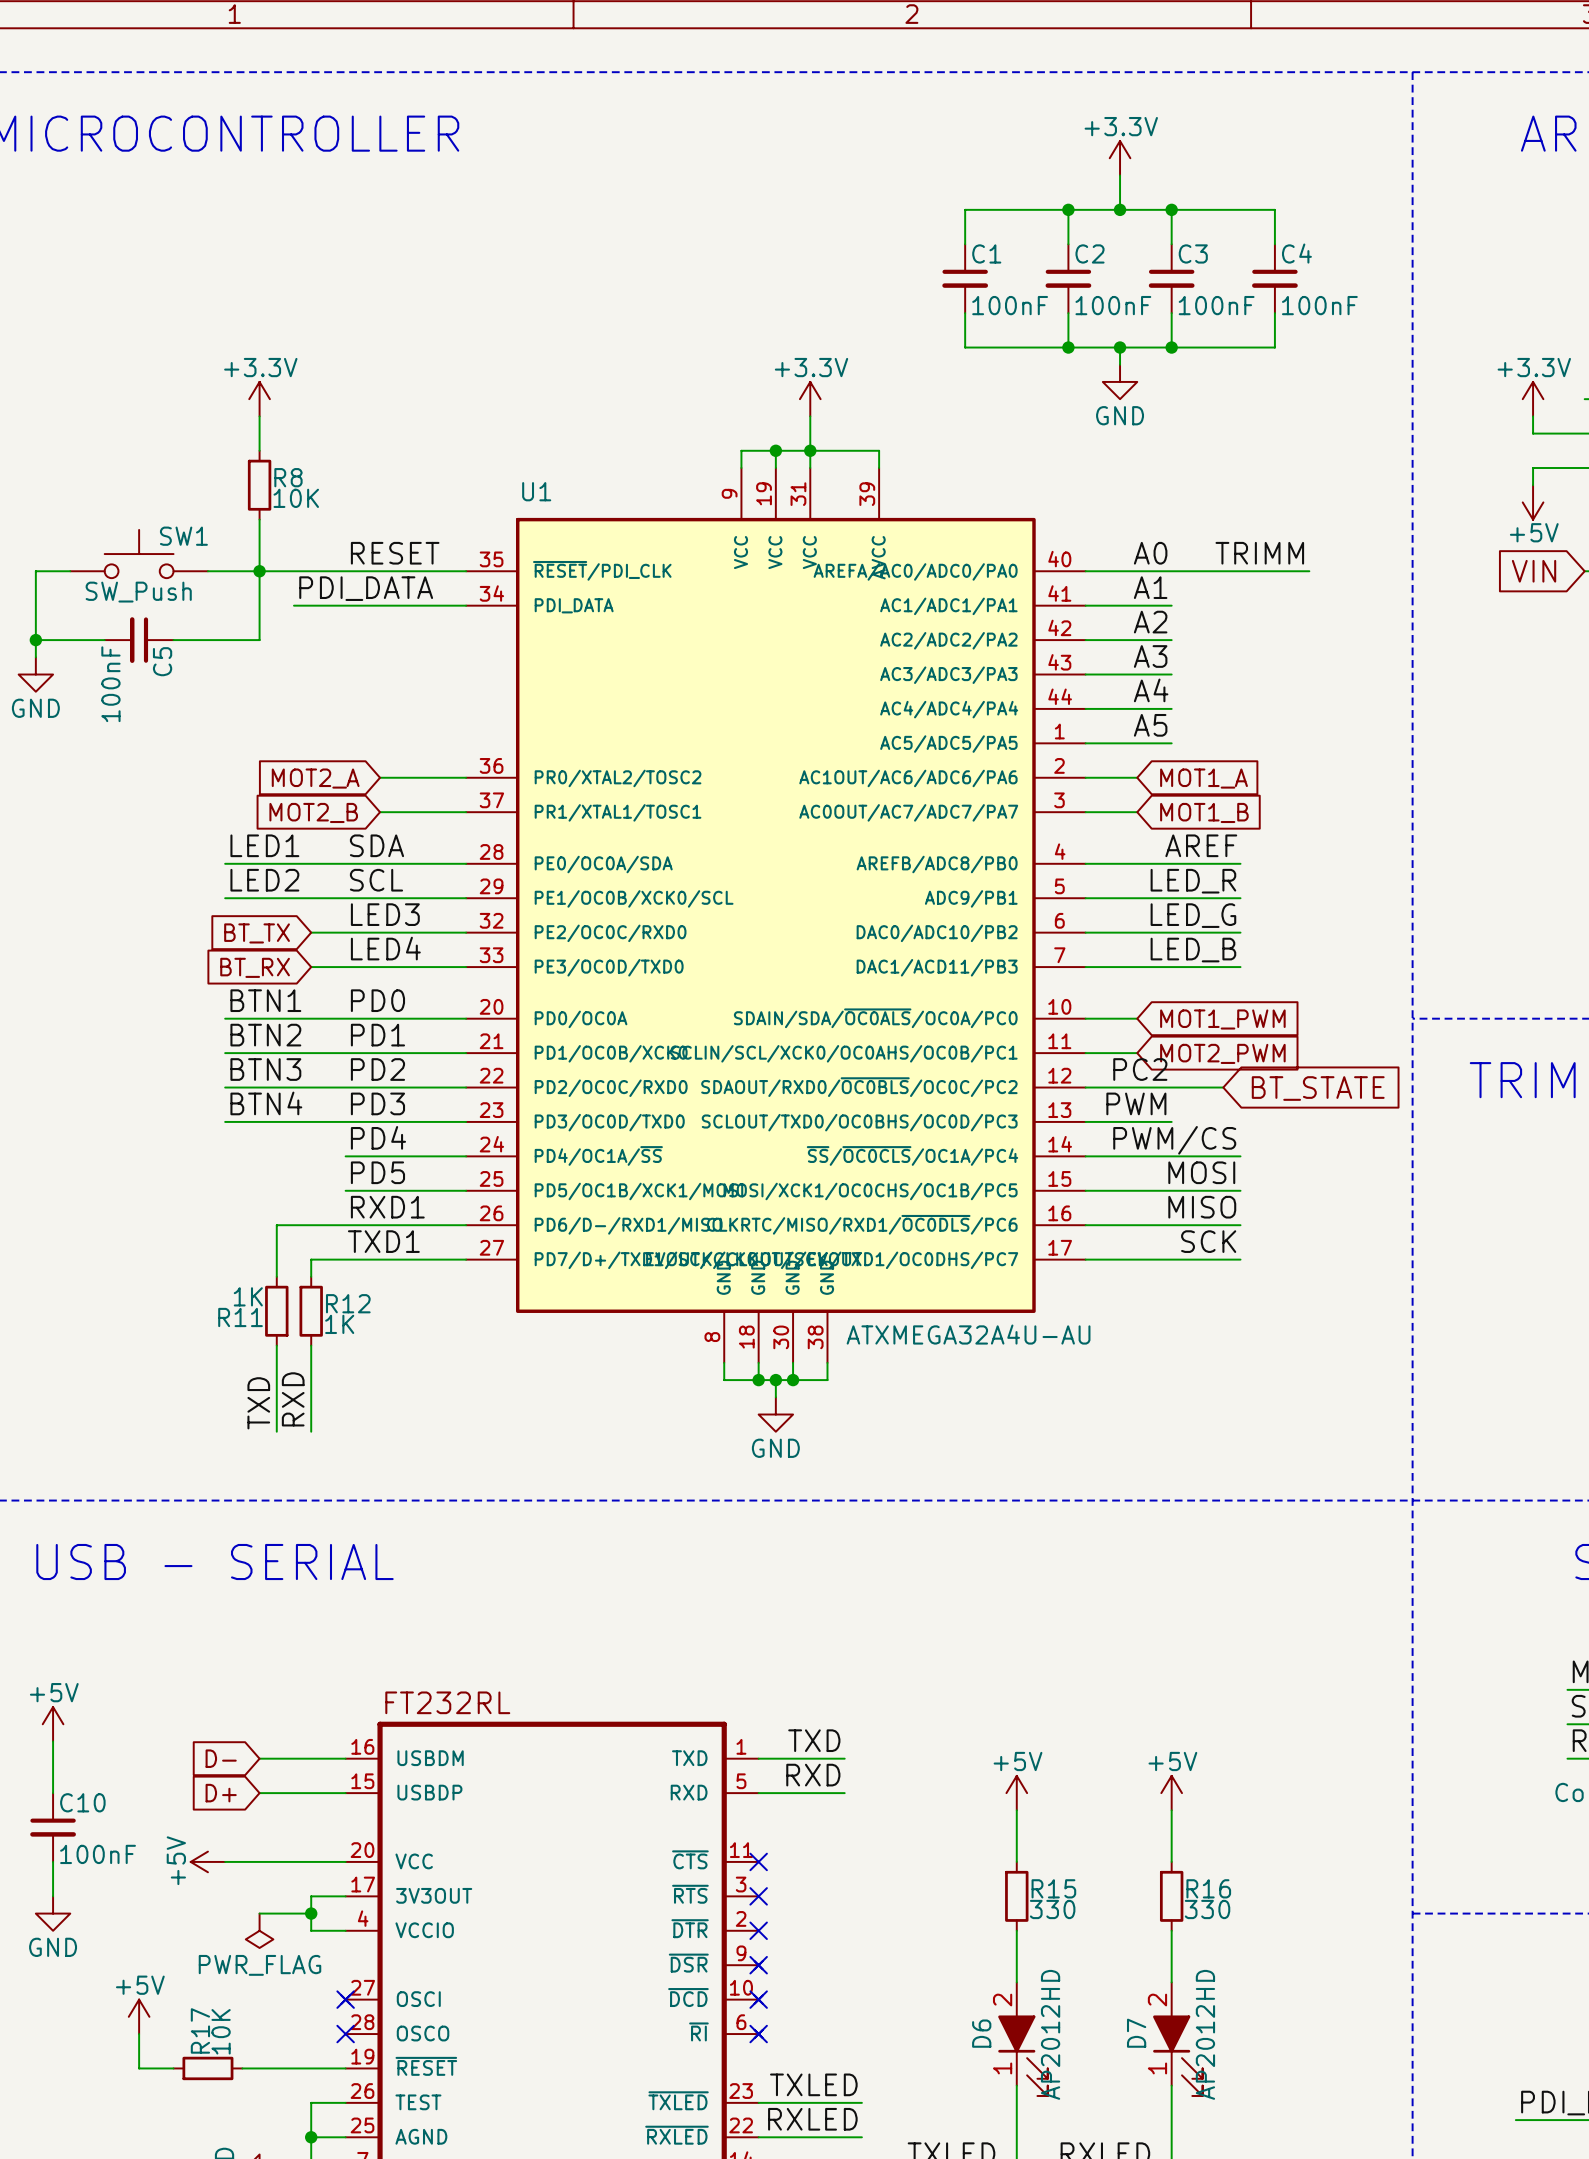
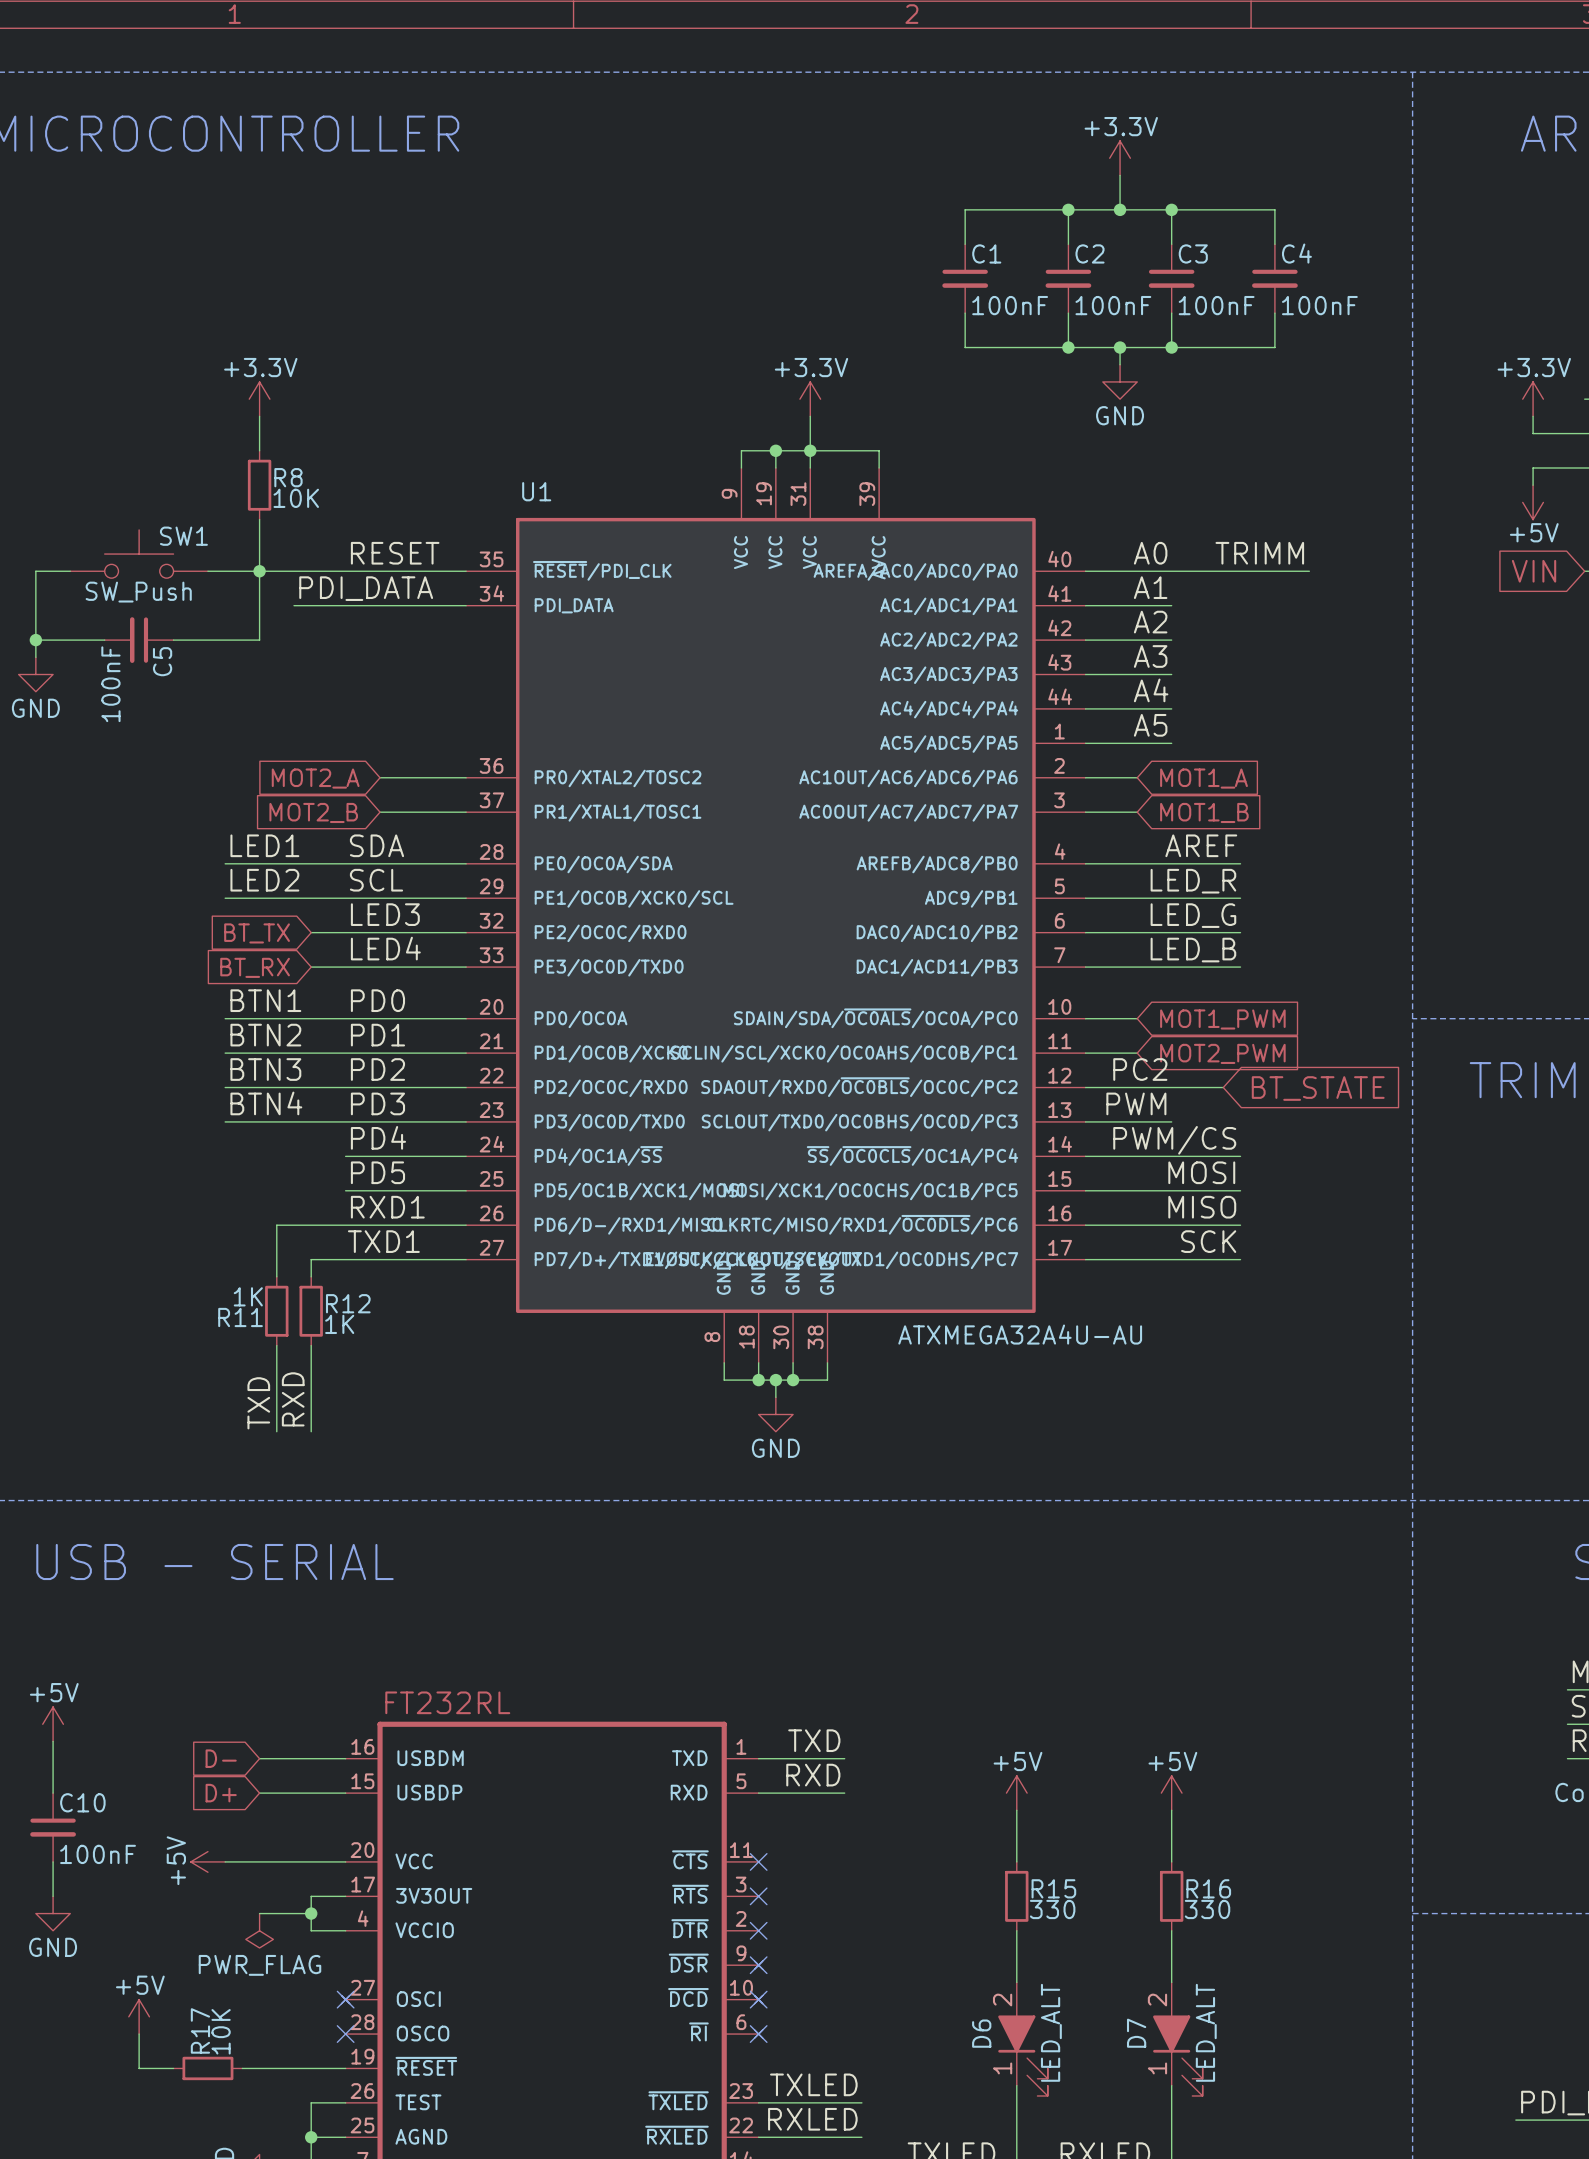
U1 value position: ATXMEGA32A4U-AU (968, 1334) -> ATXMEGA32A4U-AU (1020, 1334)
D6 value: AP2012HD (1050, 2034) -> LED_ALT (1051, 2032)
D7 value: AP2012HD (1205, 2034) -> LED_ALT (1206, 2032)

